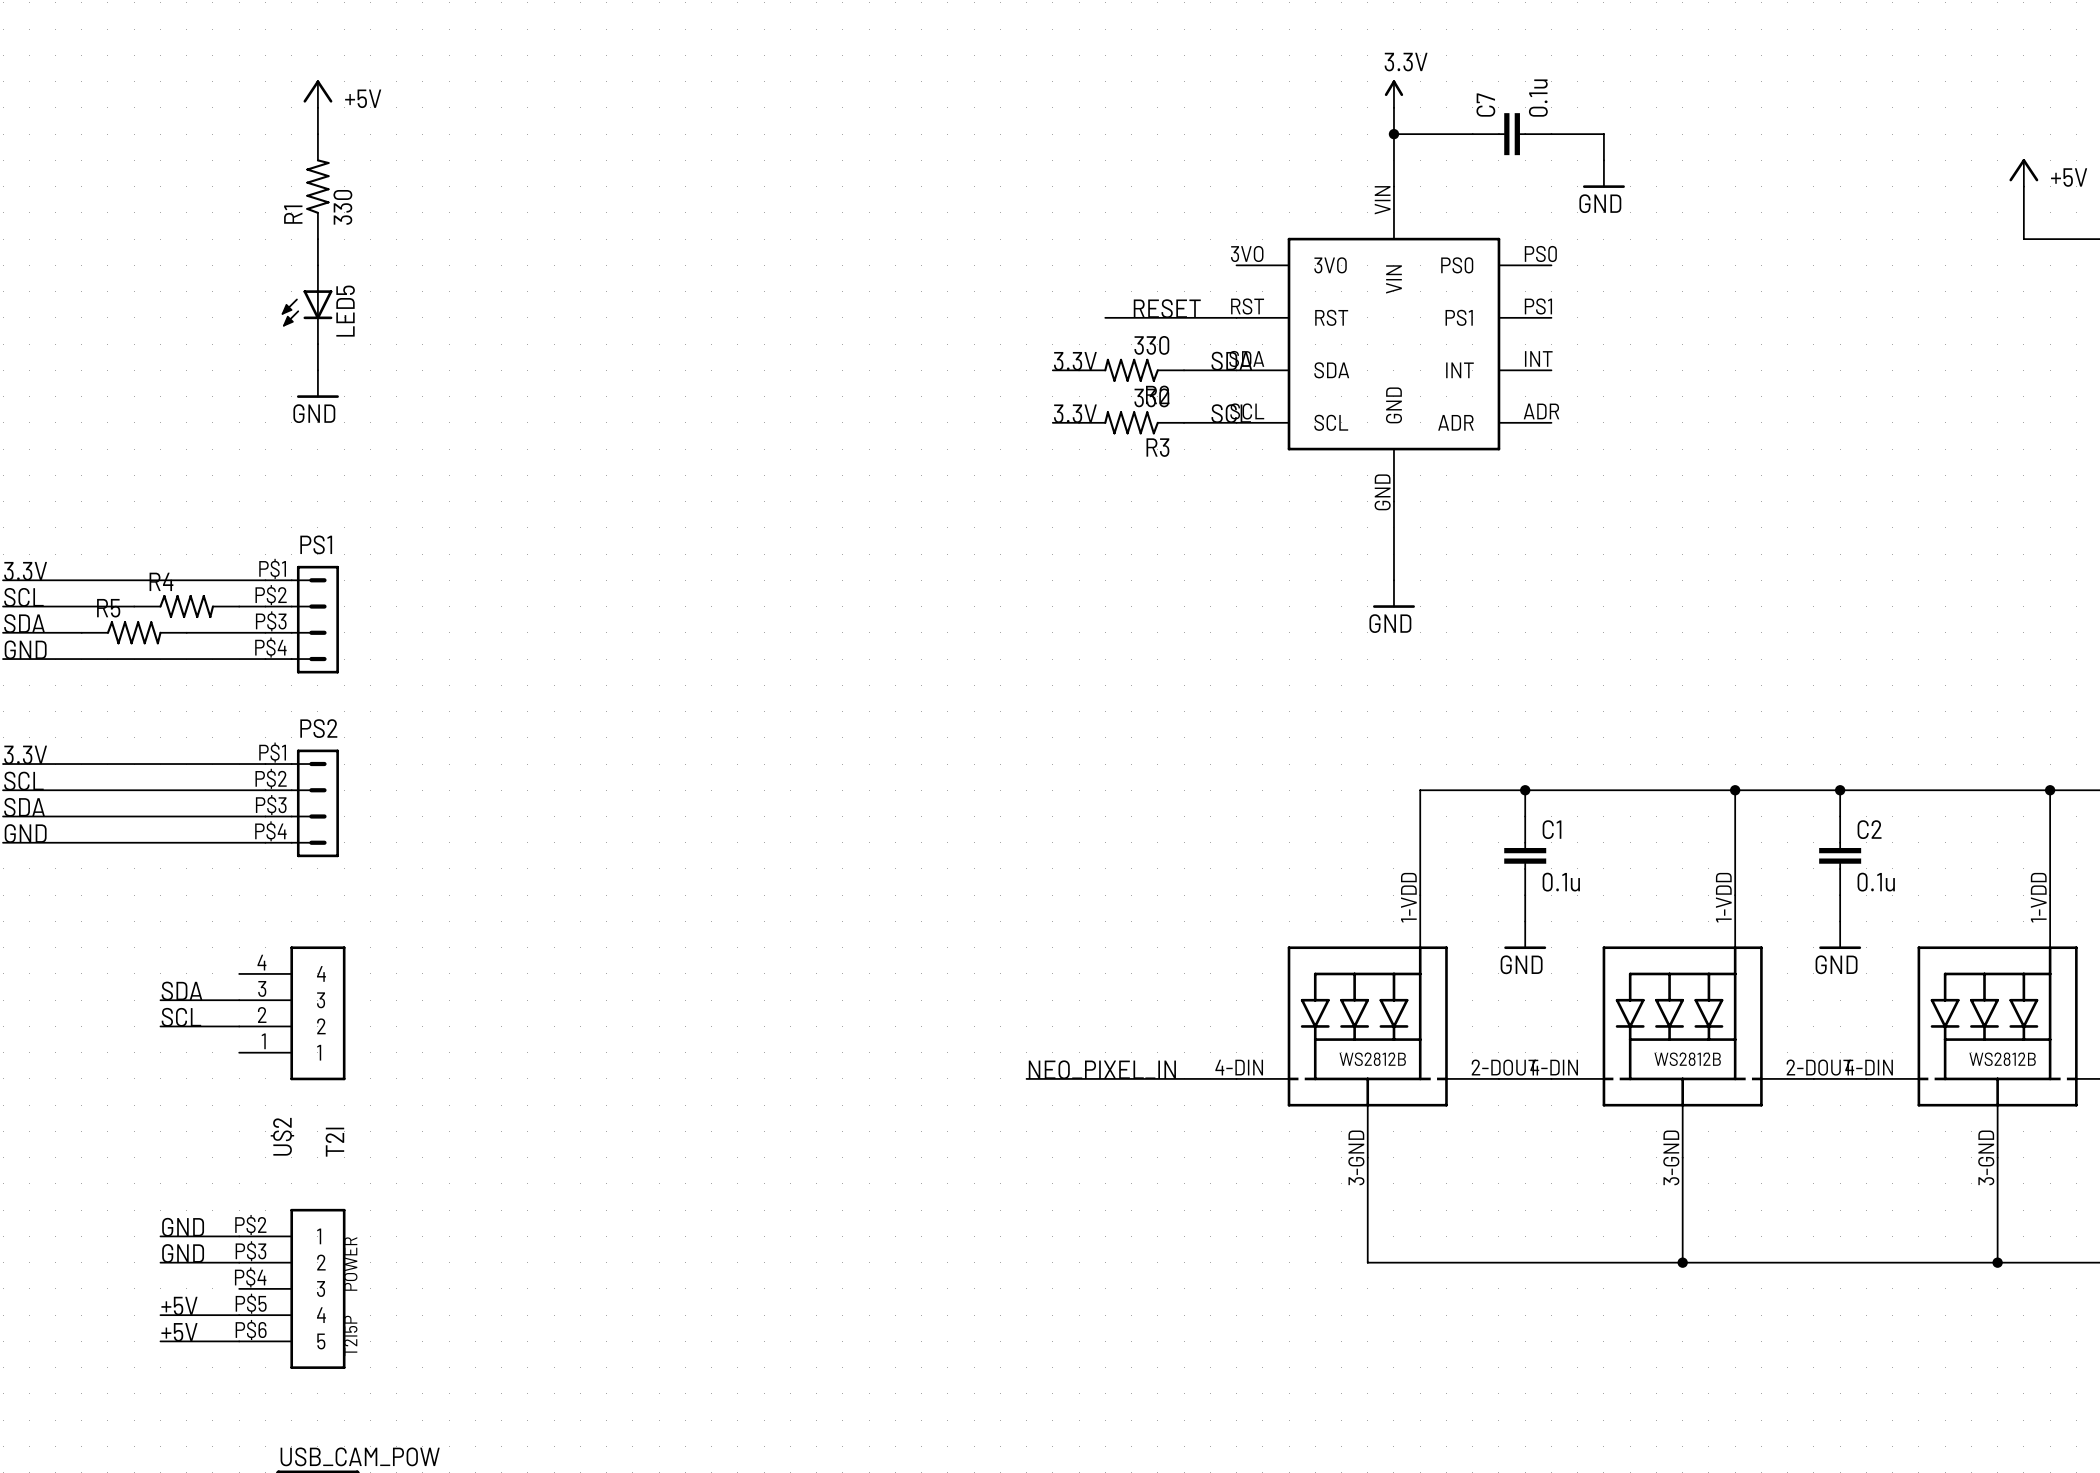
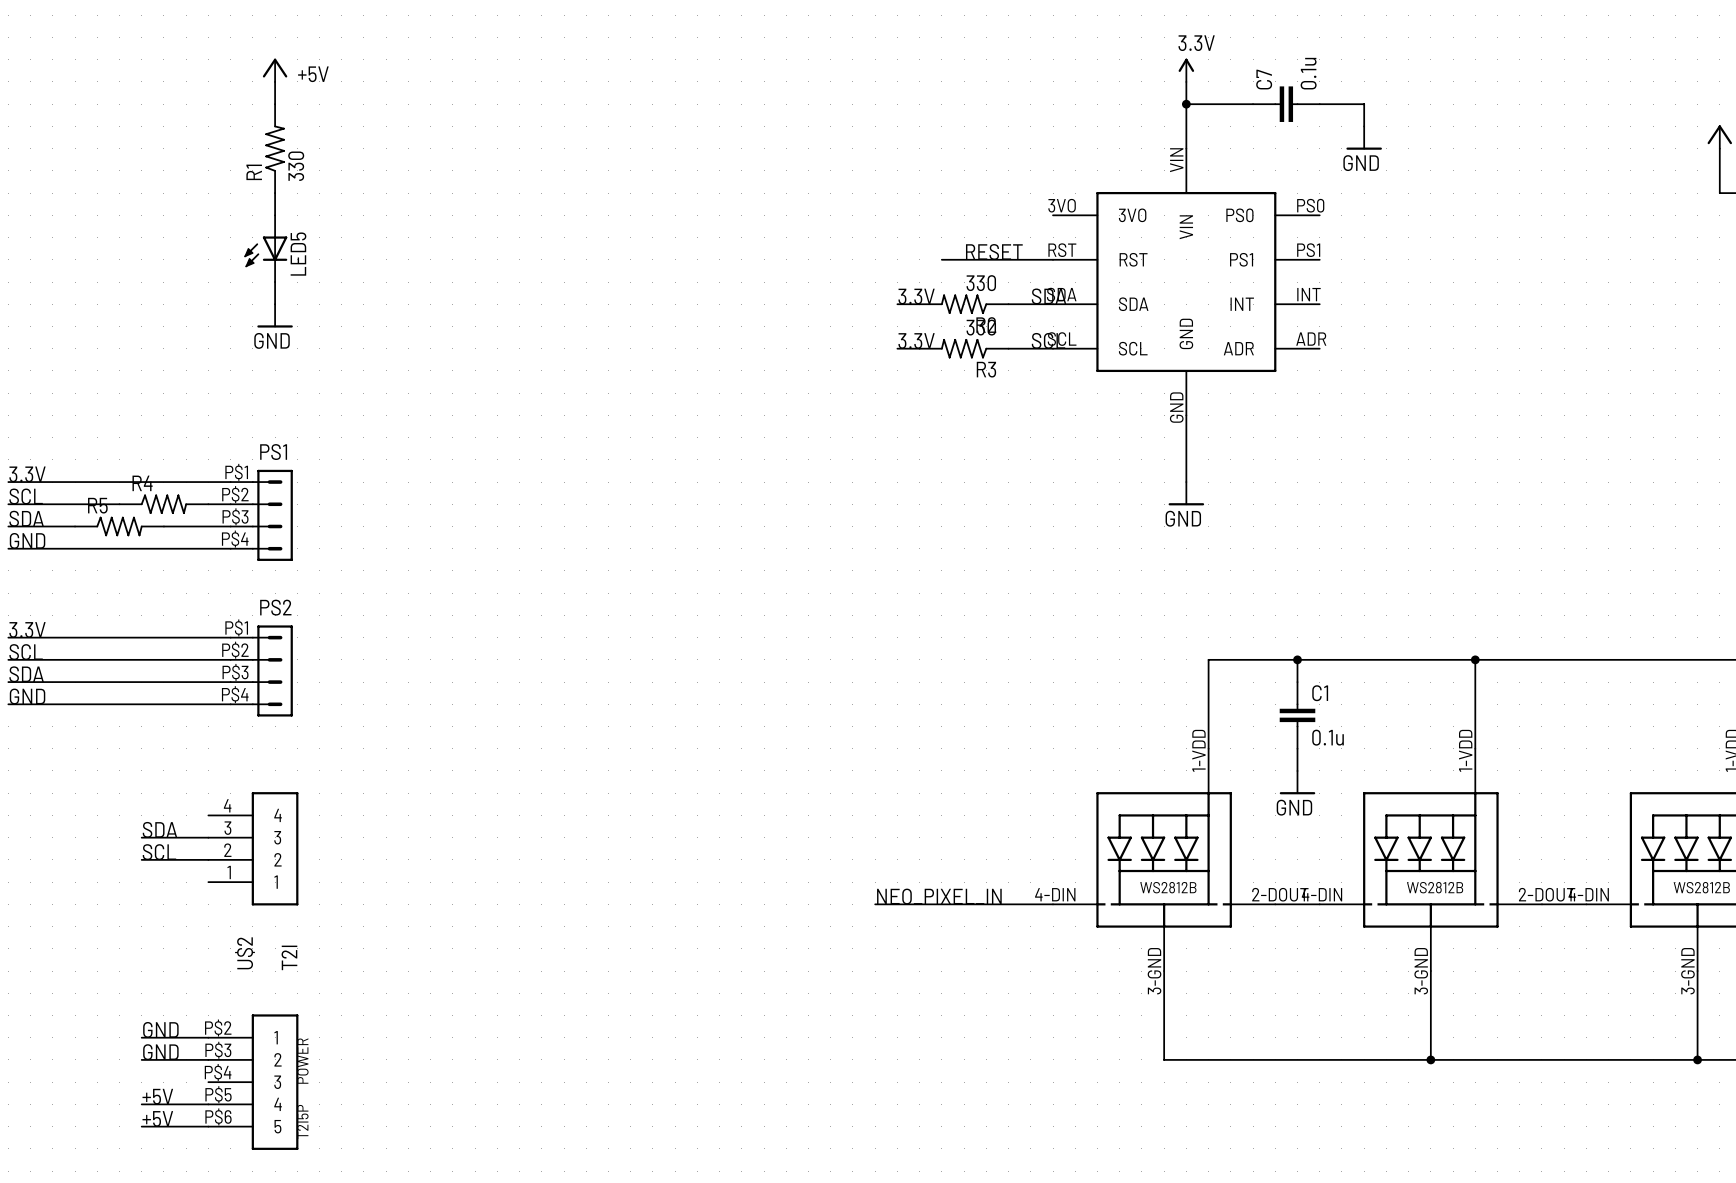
wire: (1840, 790) (1840, 816) -> none
junction: (1840, 790) -> none
C2: 0.1u (1840, 855) -> none
wire: (1840, 895) (1840, 921) -> none
power symbol: GND (1840, 935) -> none

